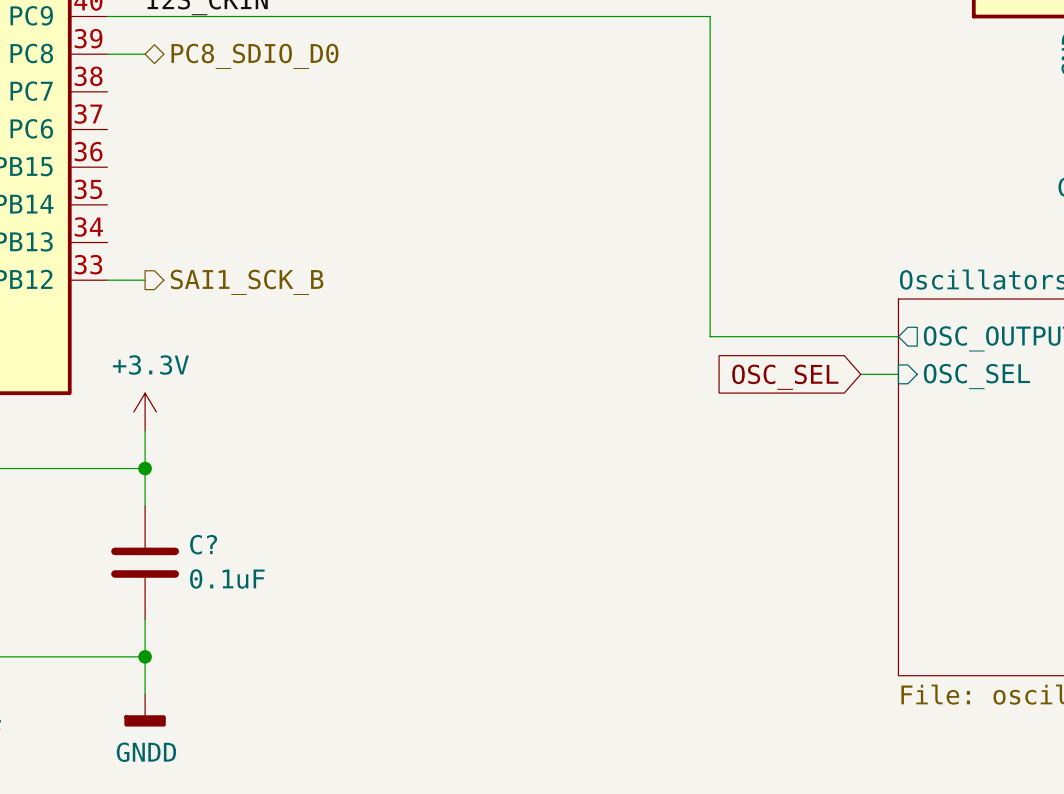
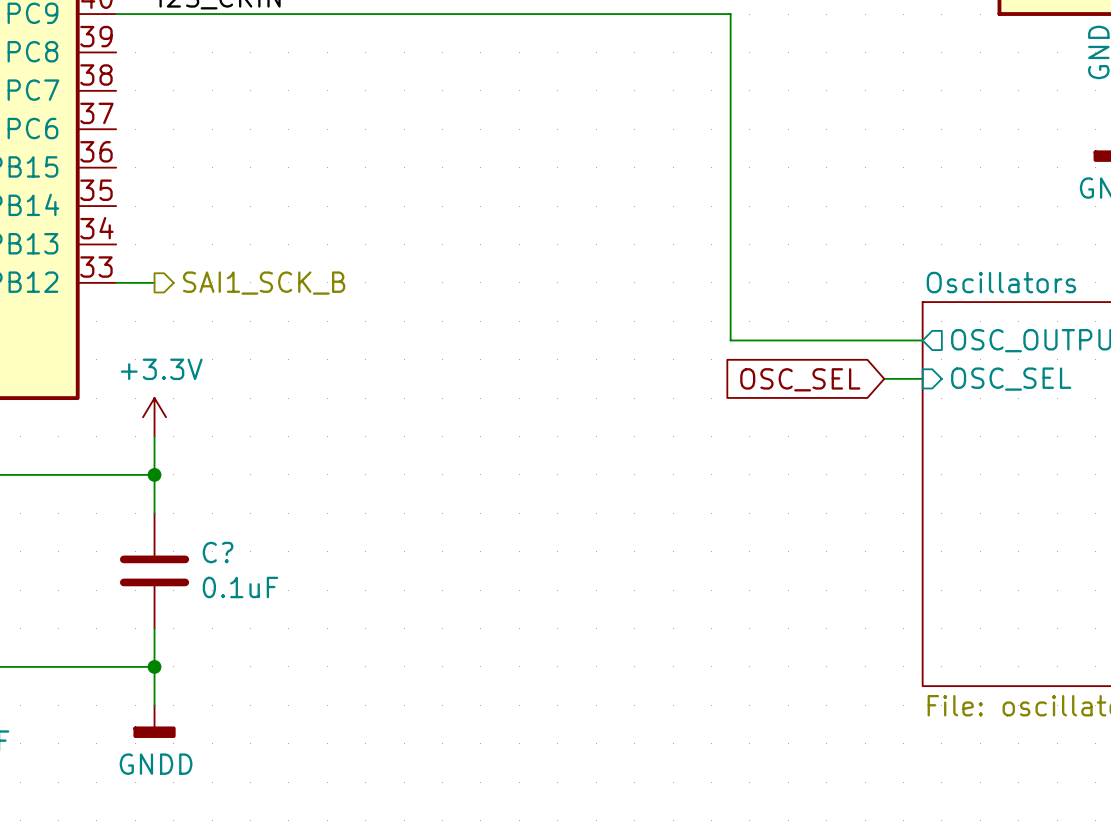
wire: (107, 54) (145, 54) -> none
hierarchical label: PC8_SDIO_D0 (254, 56) -> none

